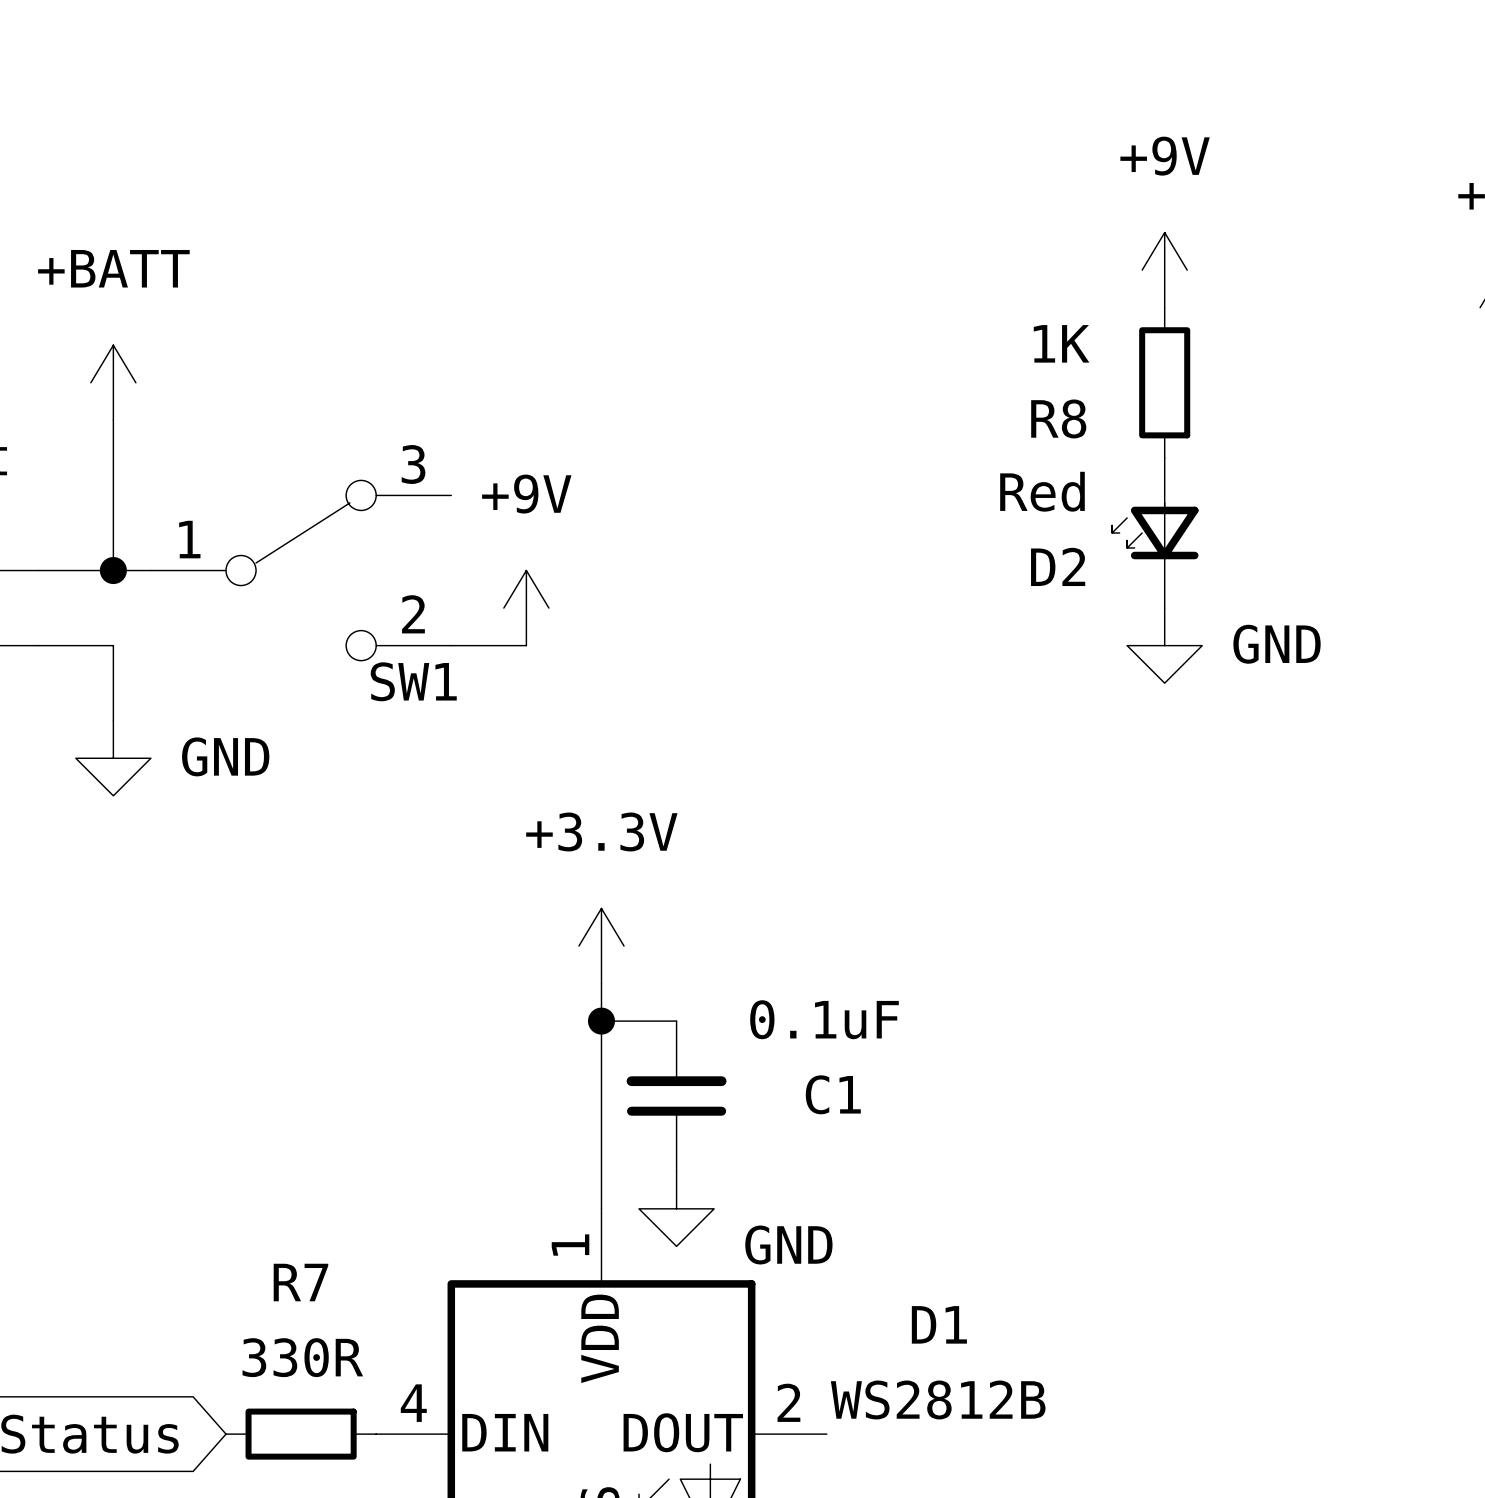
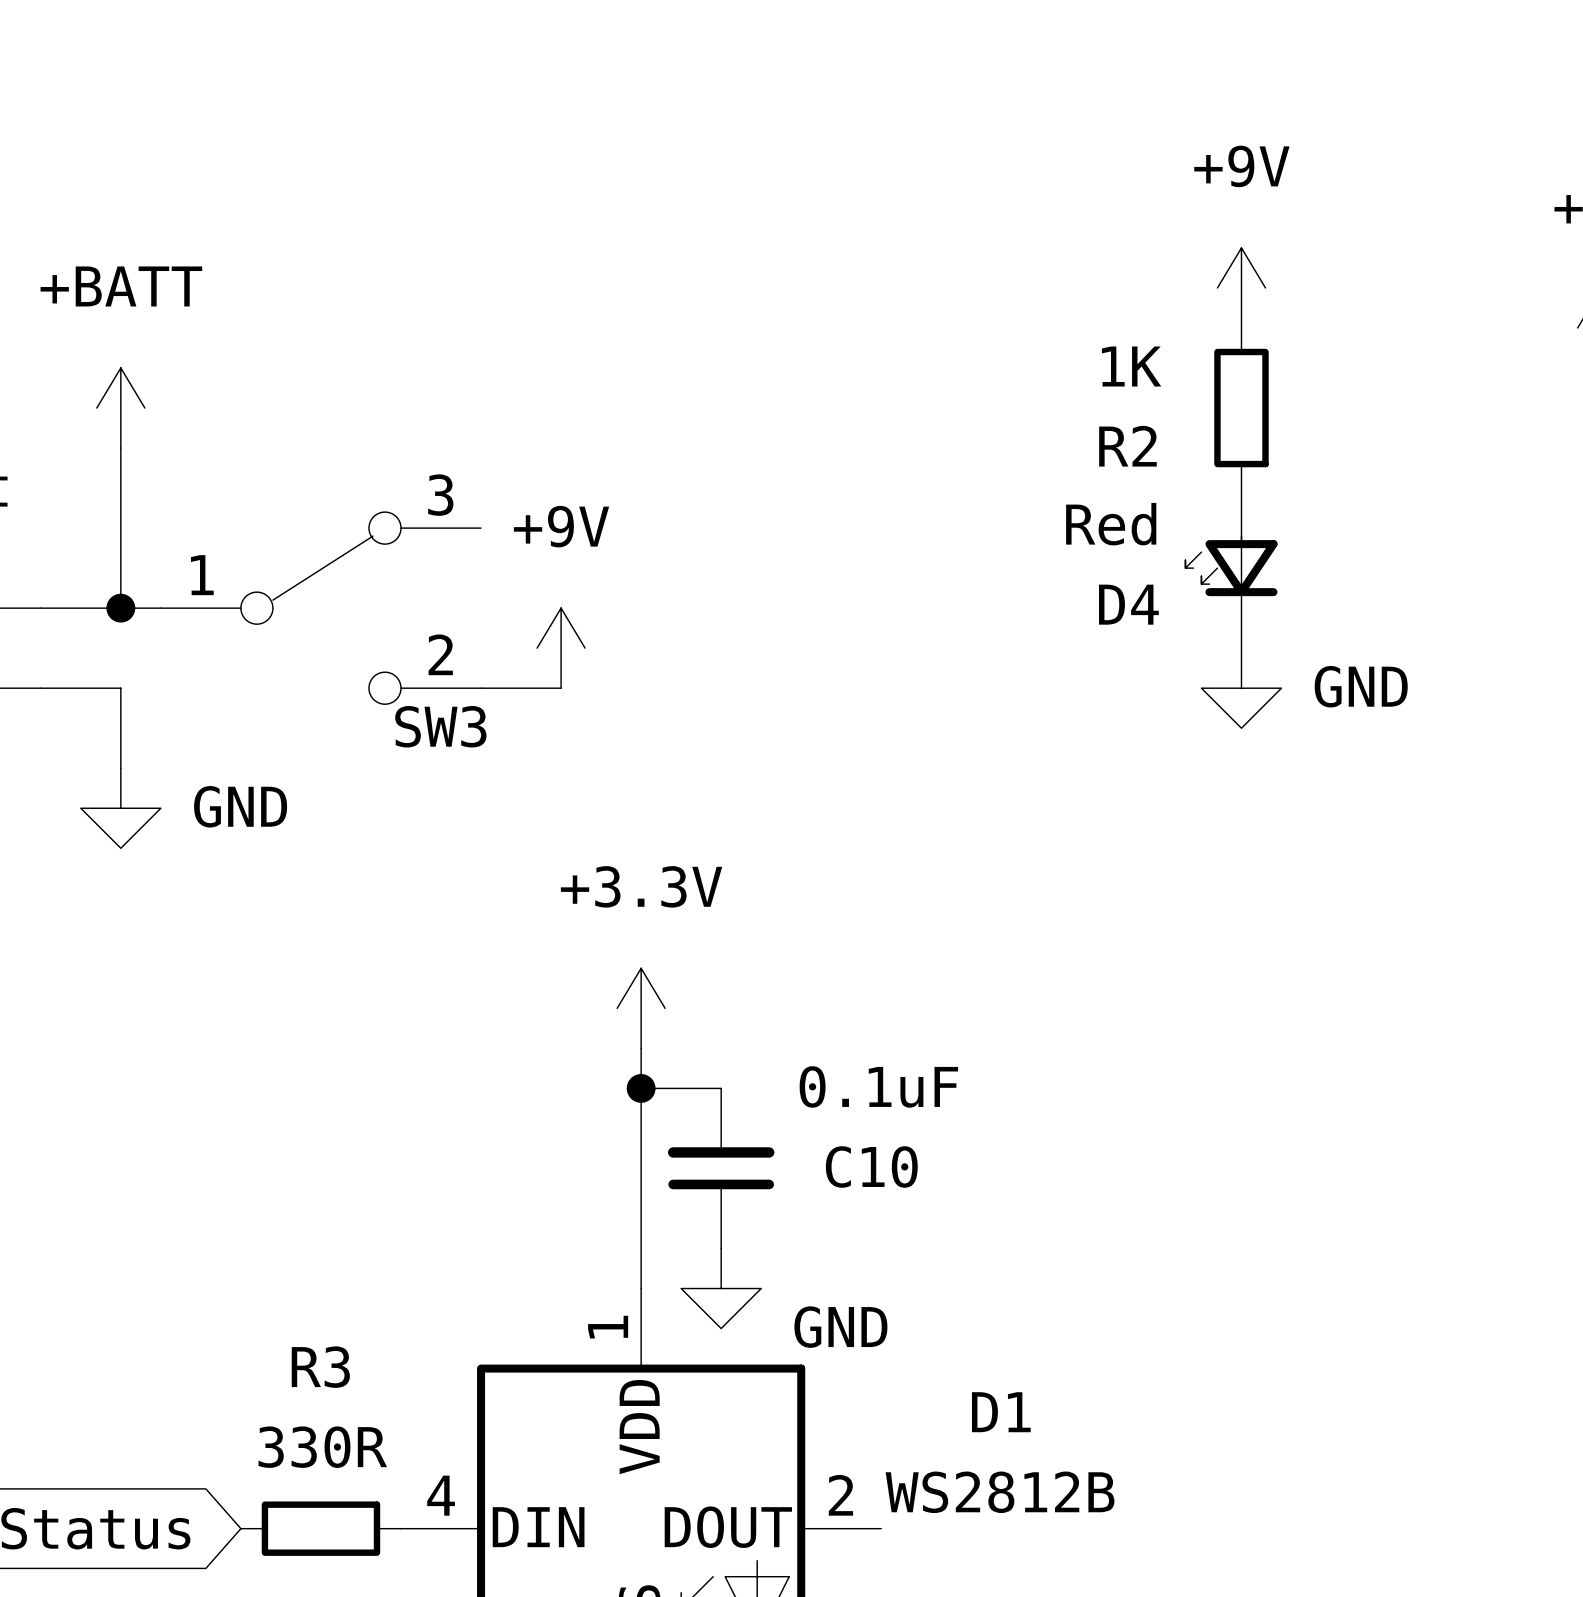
R8 name: R8 (1058, 418) -> R2 (1127, 446)
D2 name: D2 (1058, 566) -> D4 (1128, 604)
SW1 name: SW1 (413, 681) -> SW3 (440, 726)
C1 name: C1 (833, 1094) -> C10 (871, 1167)
R7 name: R7 (300, 1282) -> R3 (320, 1367)

